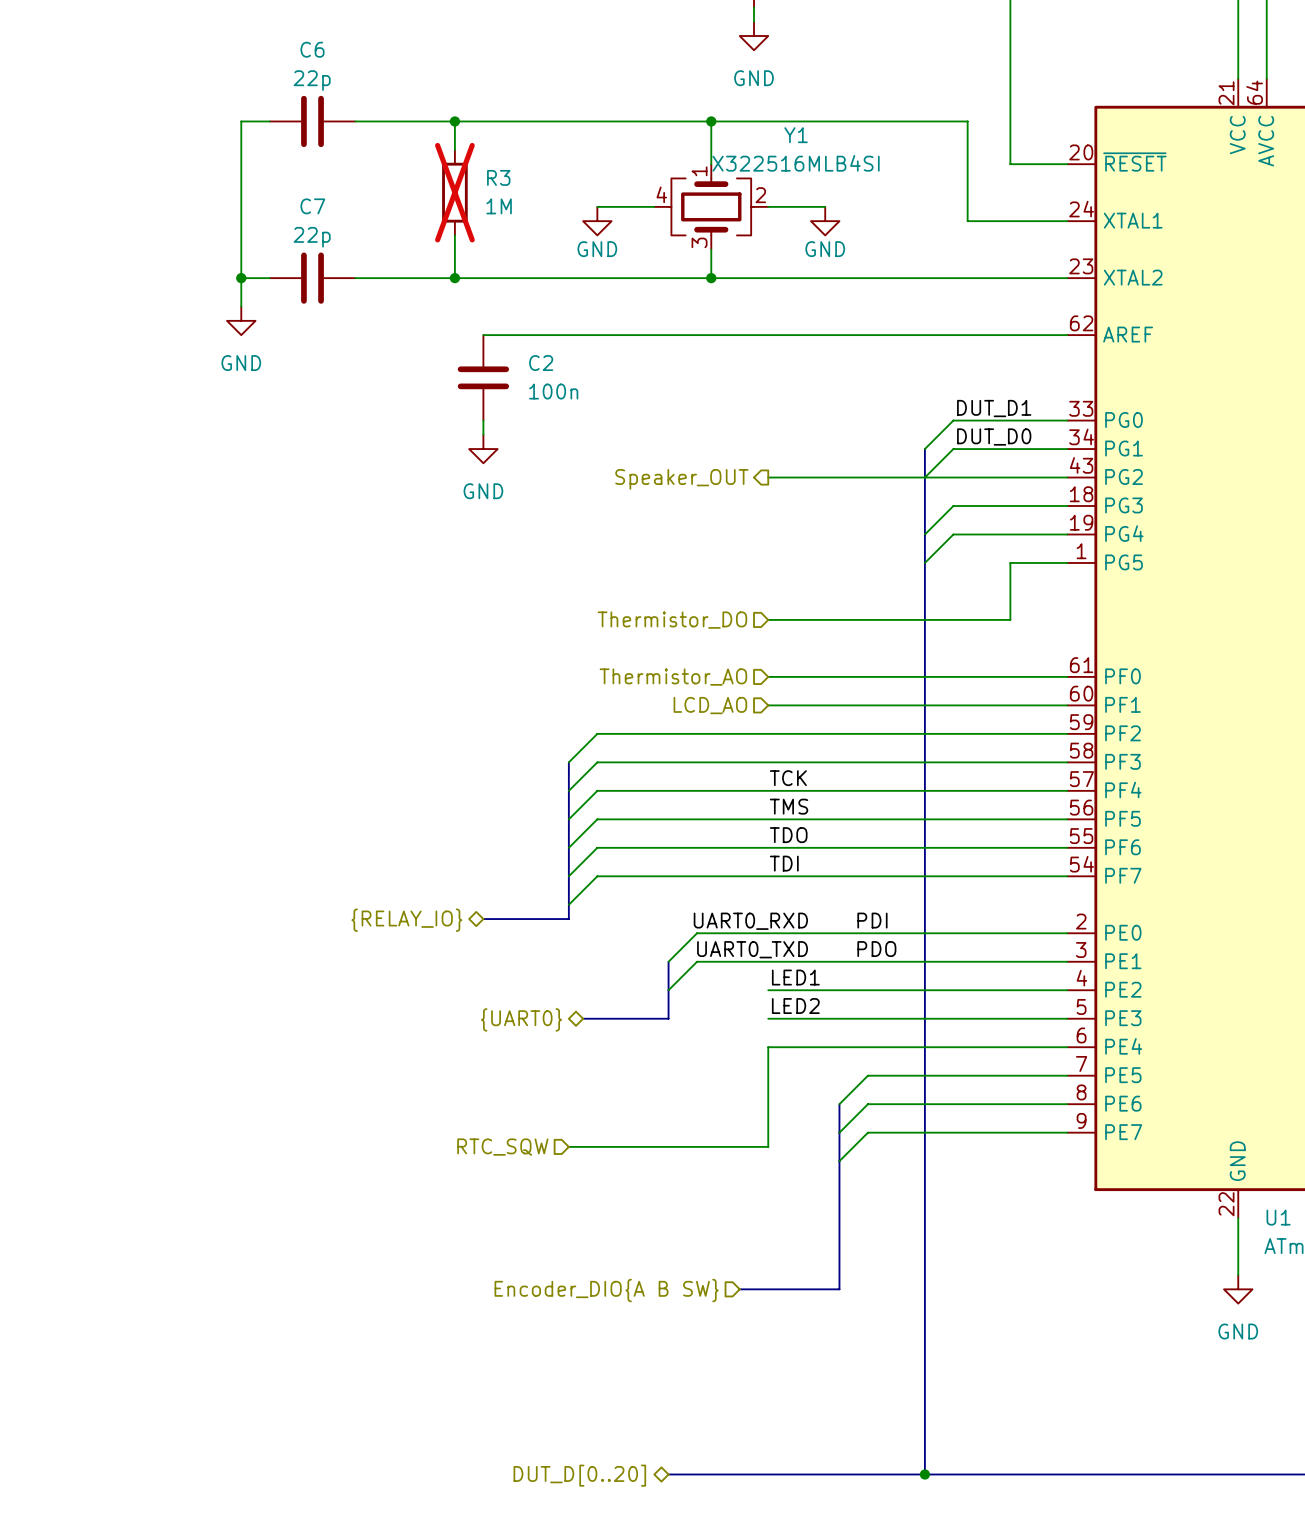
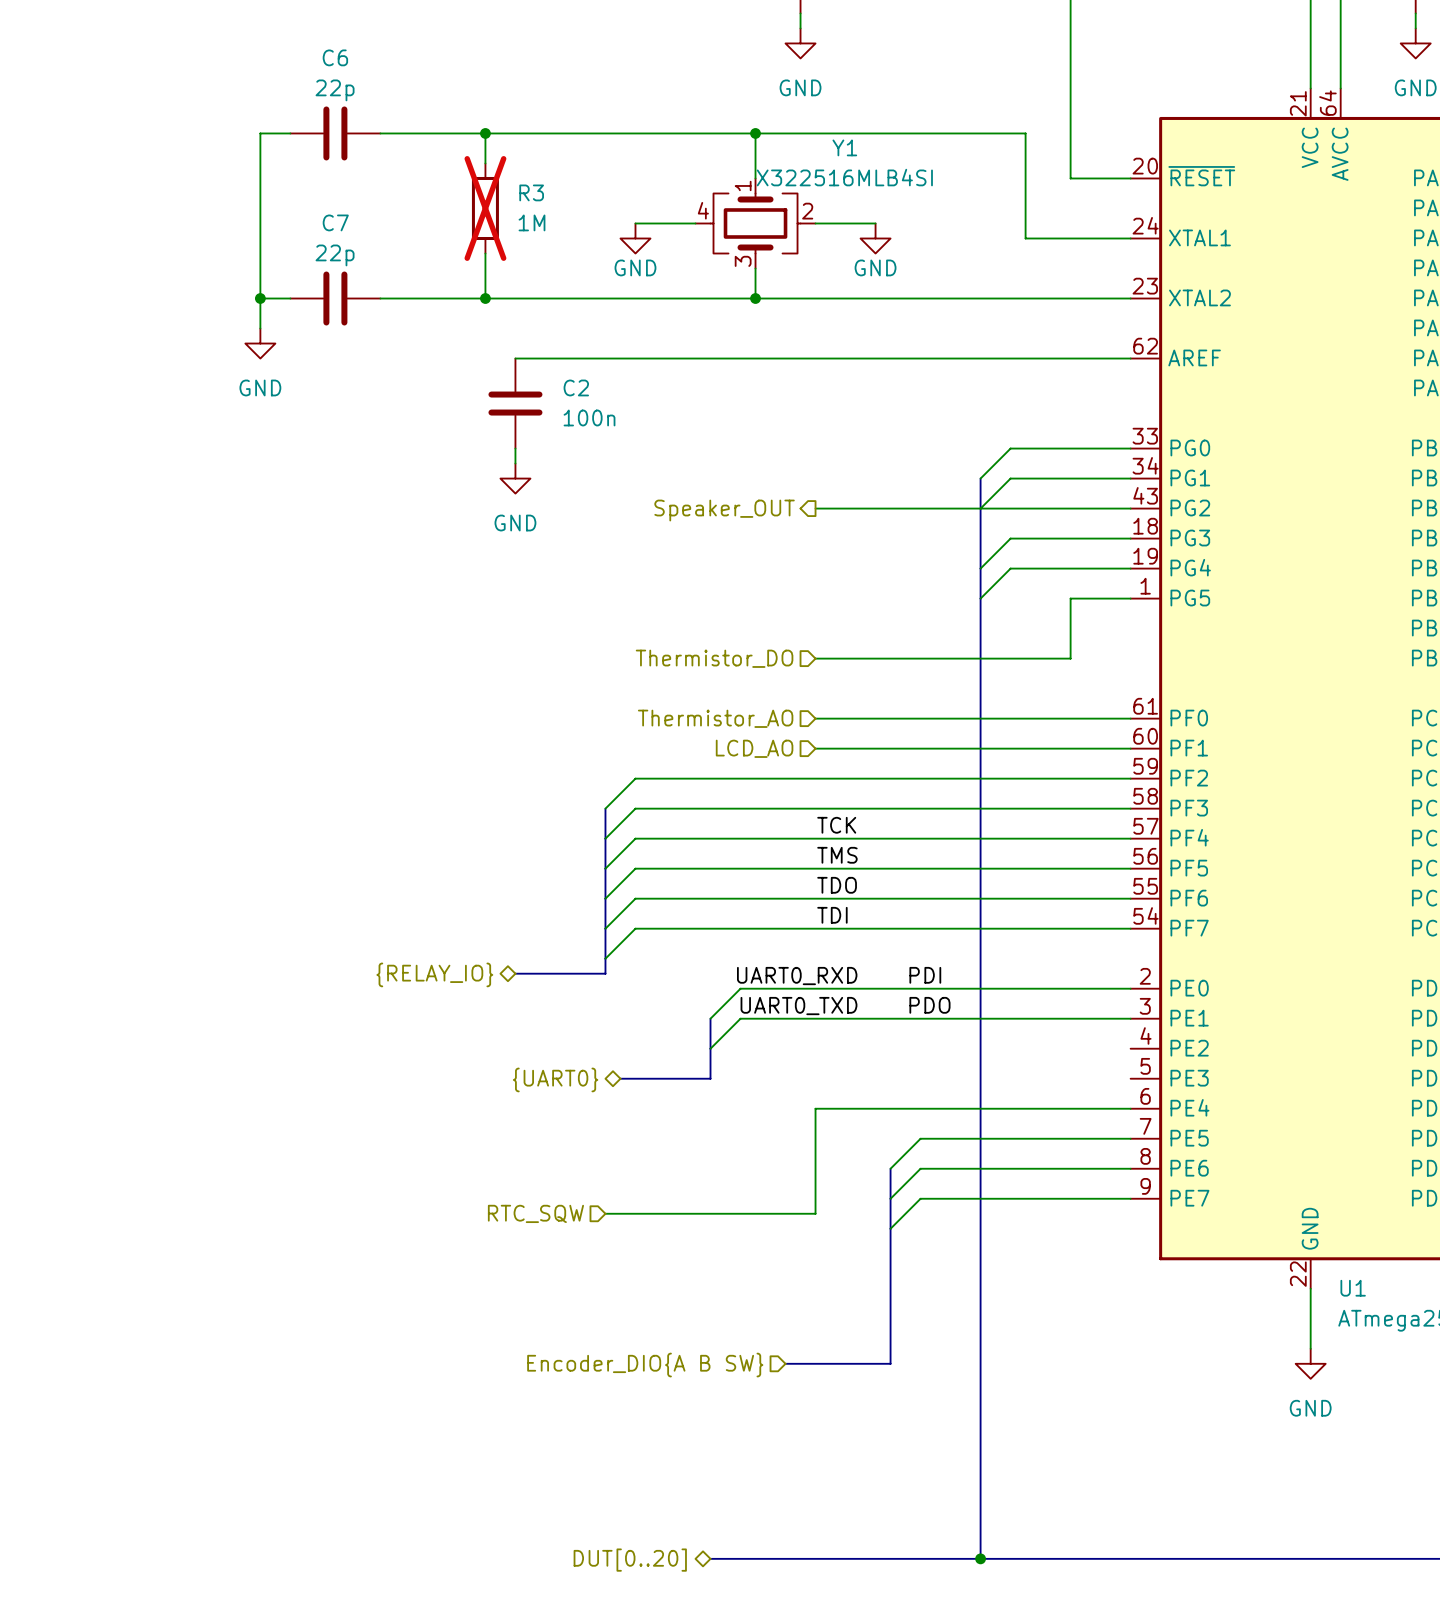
label: DUT_D1 (994, 408) -> none
label: DUT_D0 (994, 437) -> none
label: LED1 (795, 977) -> none
wire: (768, 990) (1067, 990) -> none
label: LED2 (795, 1006) -> none
wire: (768, 1018) (1067, 1018) -> none
hierarchical label: DUT_D[0..20] (579, 1475) -> DUT[0..20] (630, 1560)

